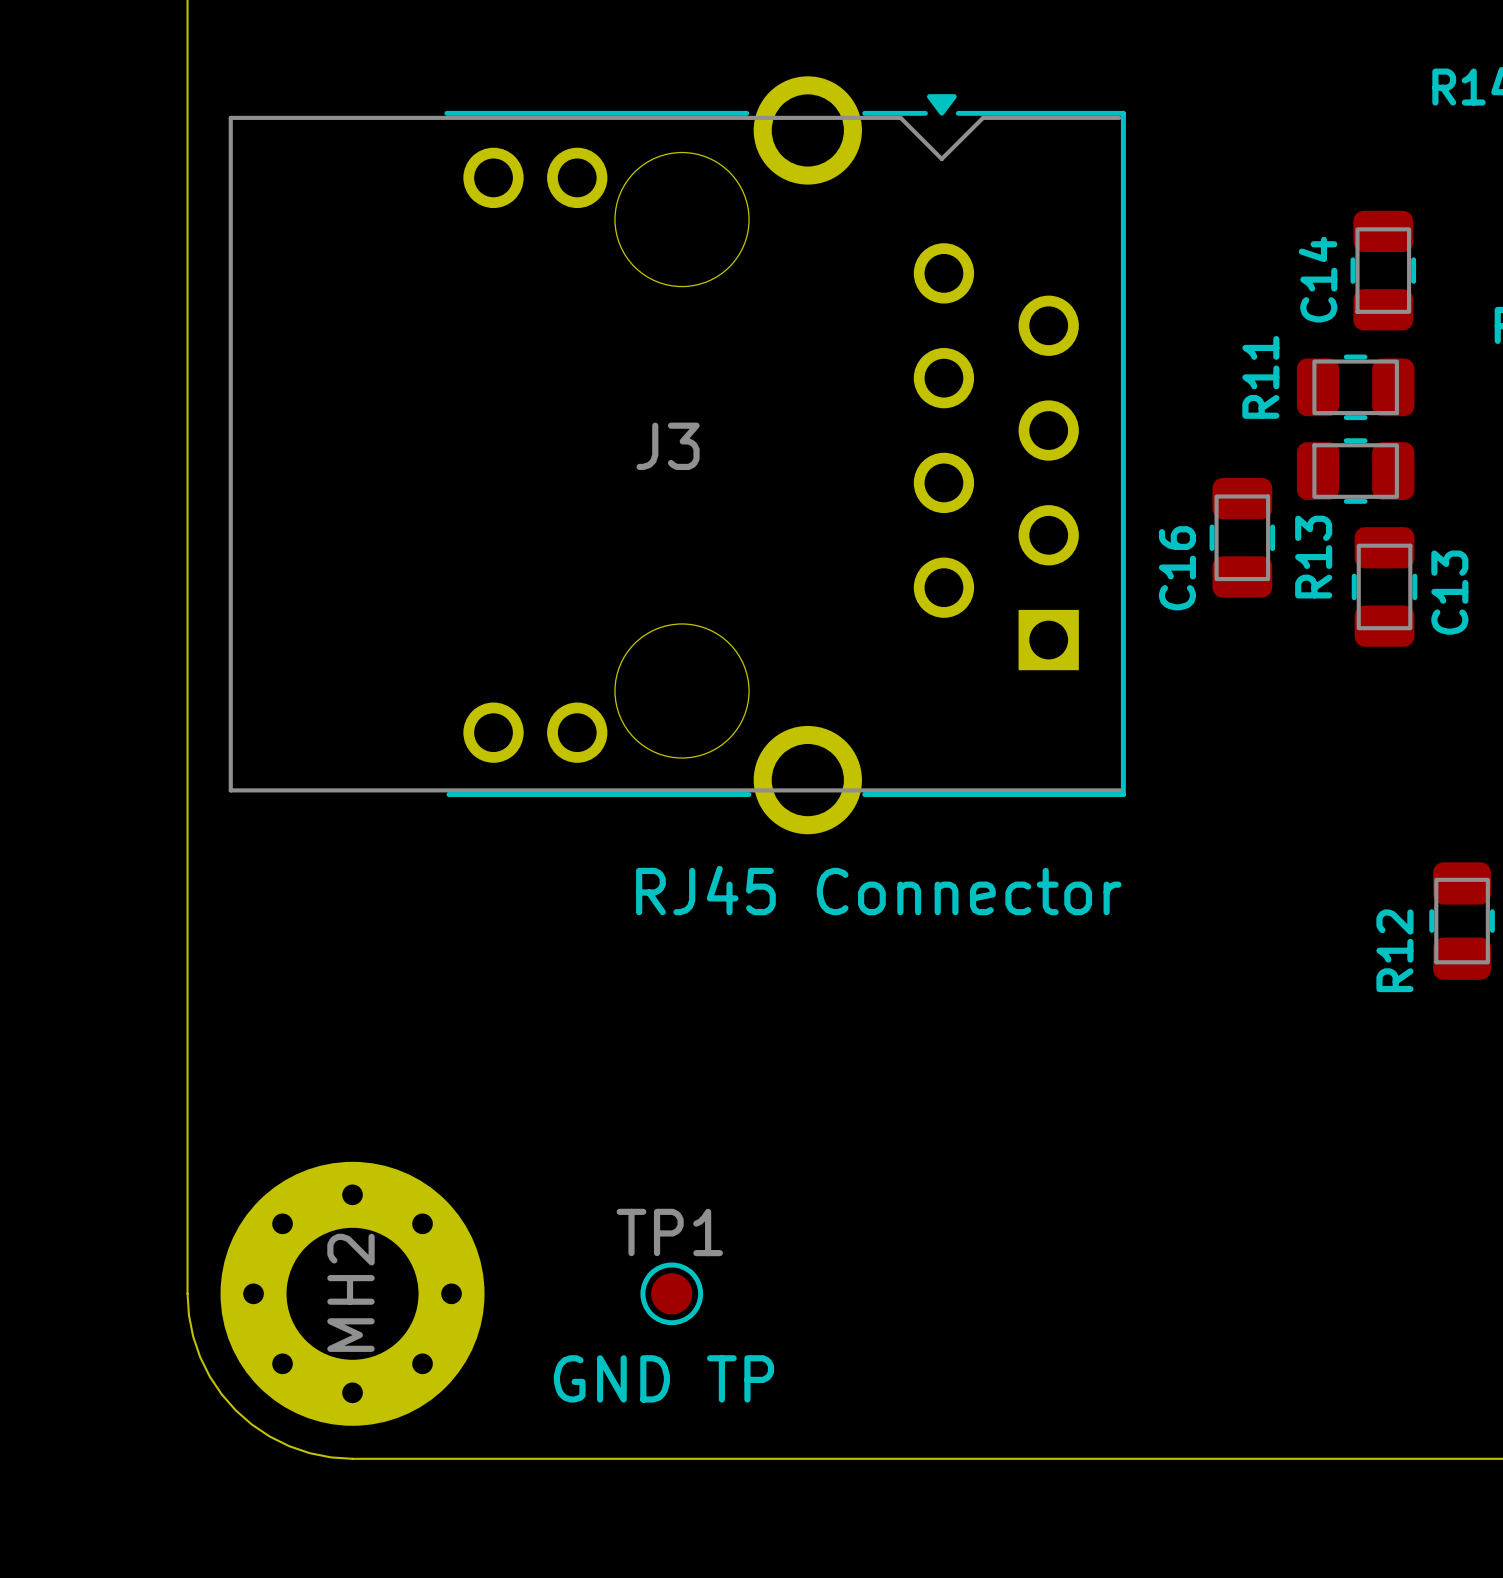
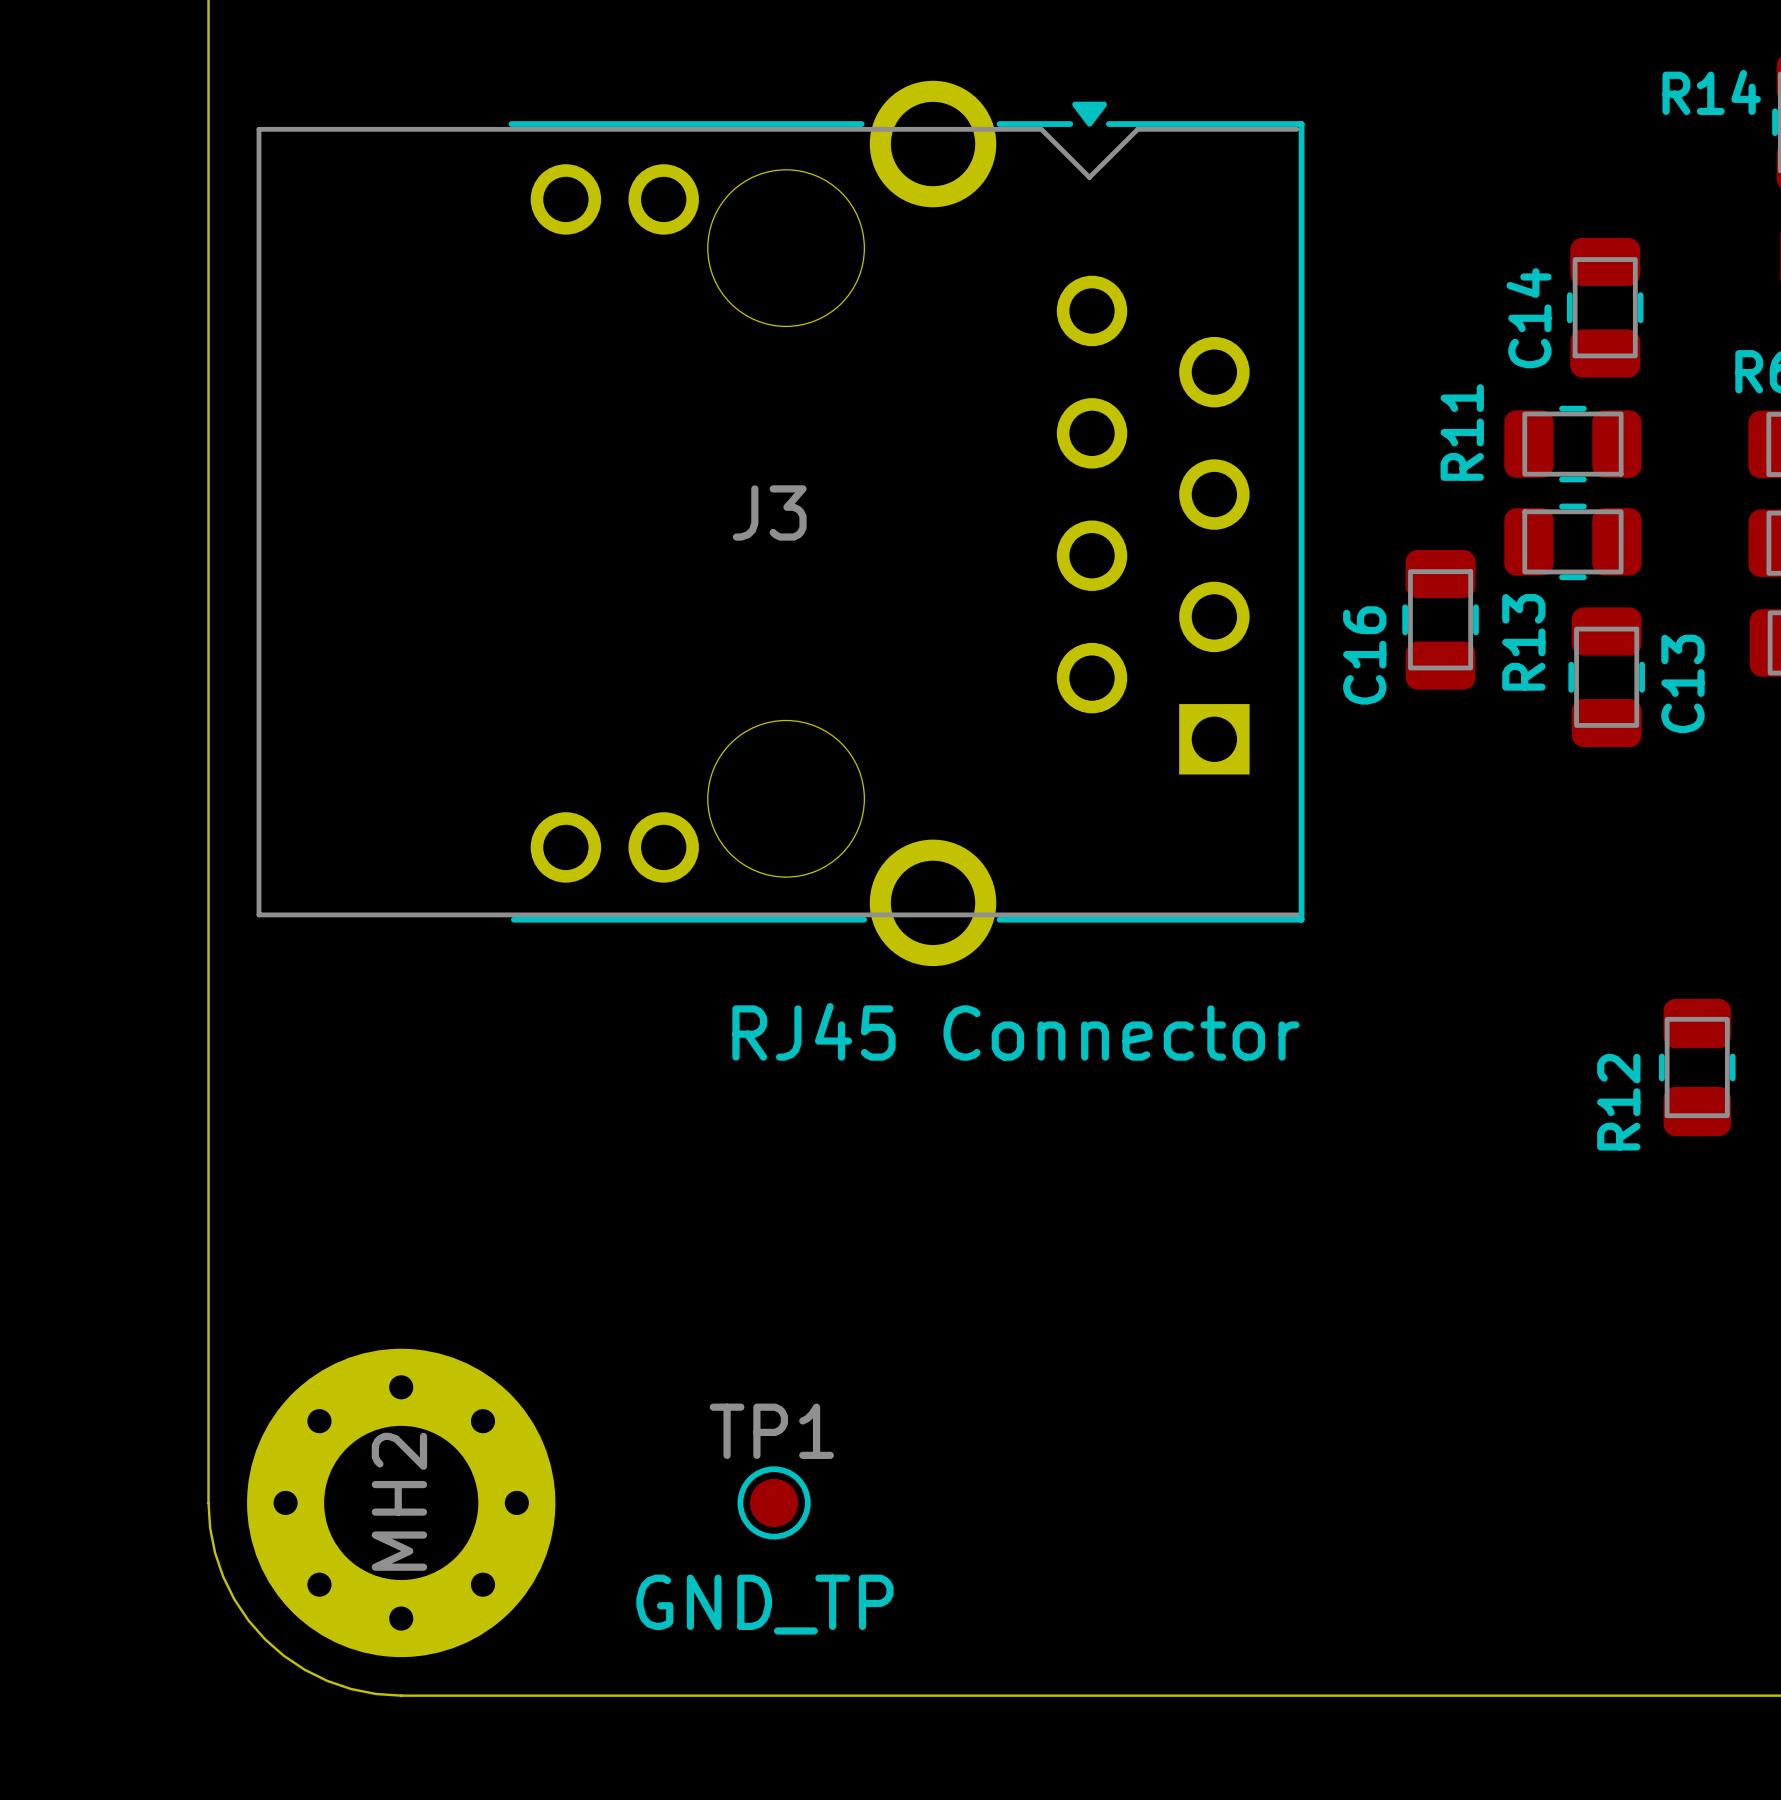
TP1 text: GND TP (663, 1378) -> GND_TP (764, 1604)

